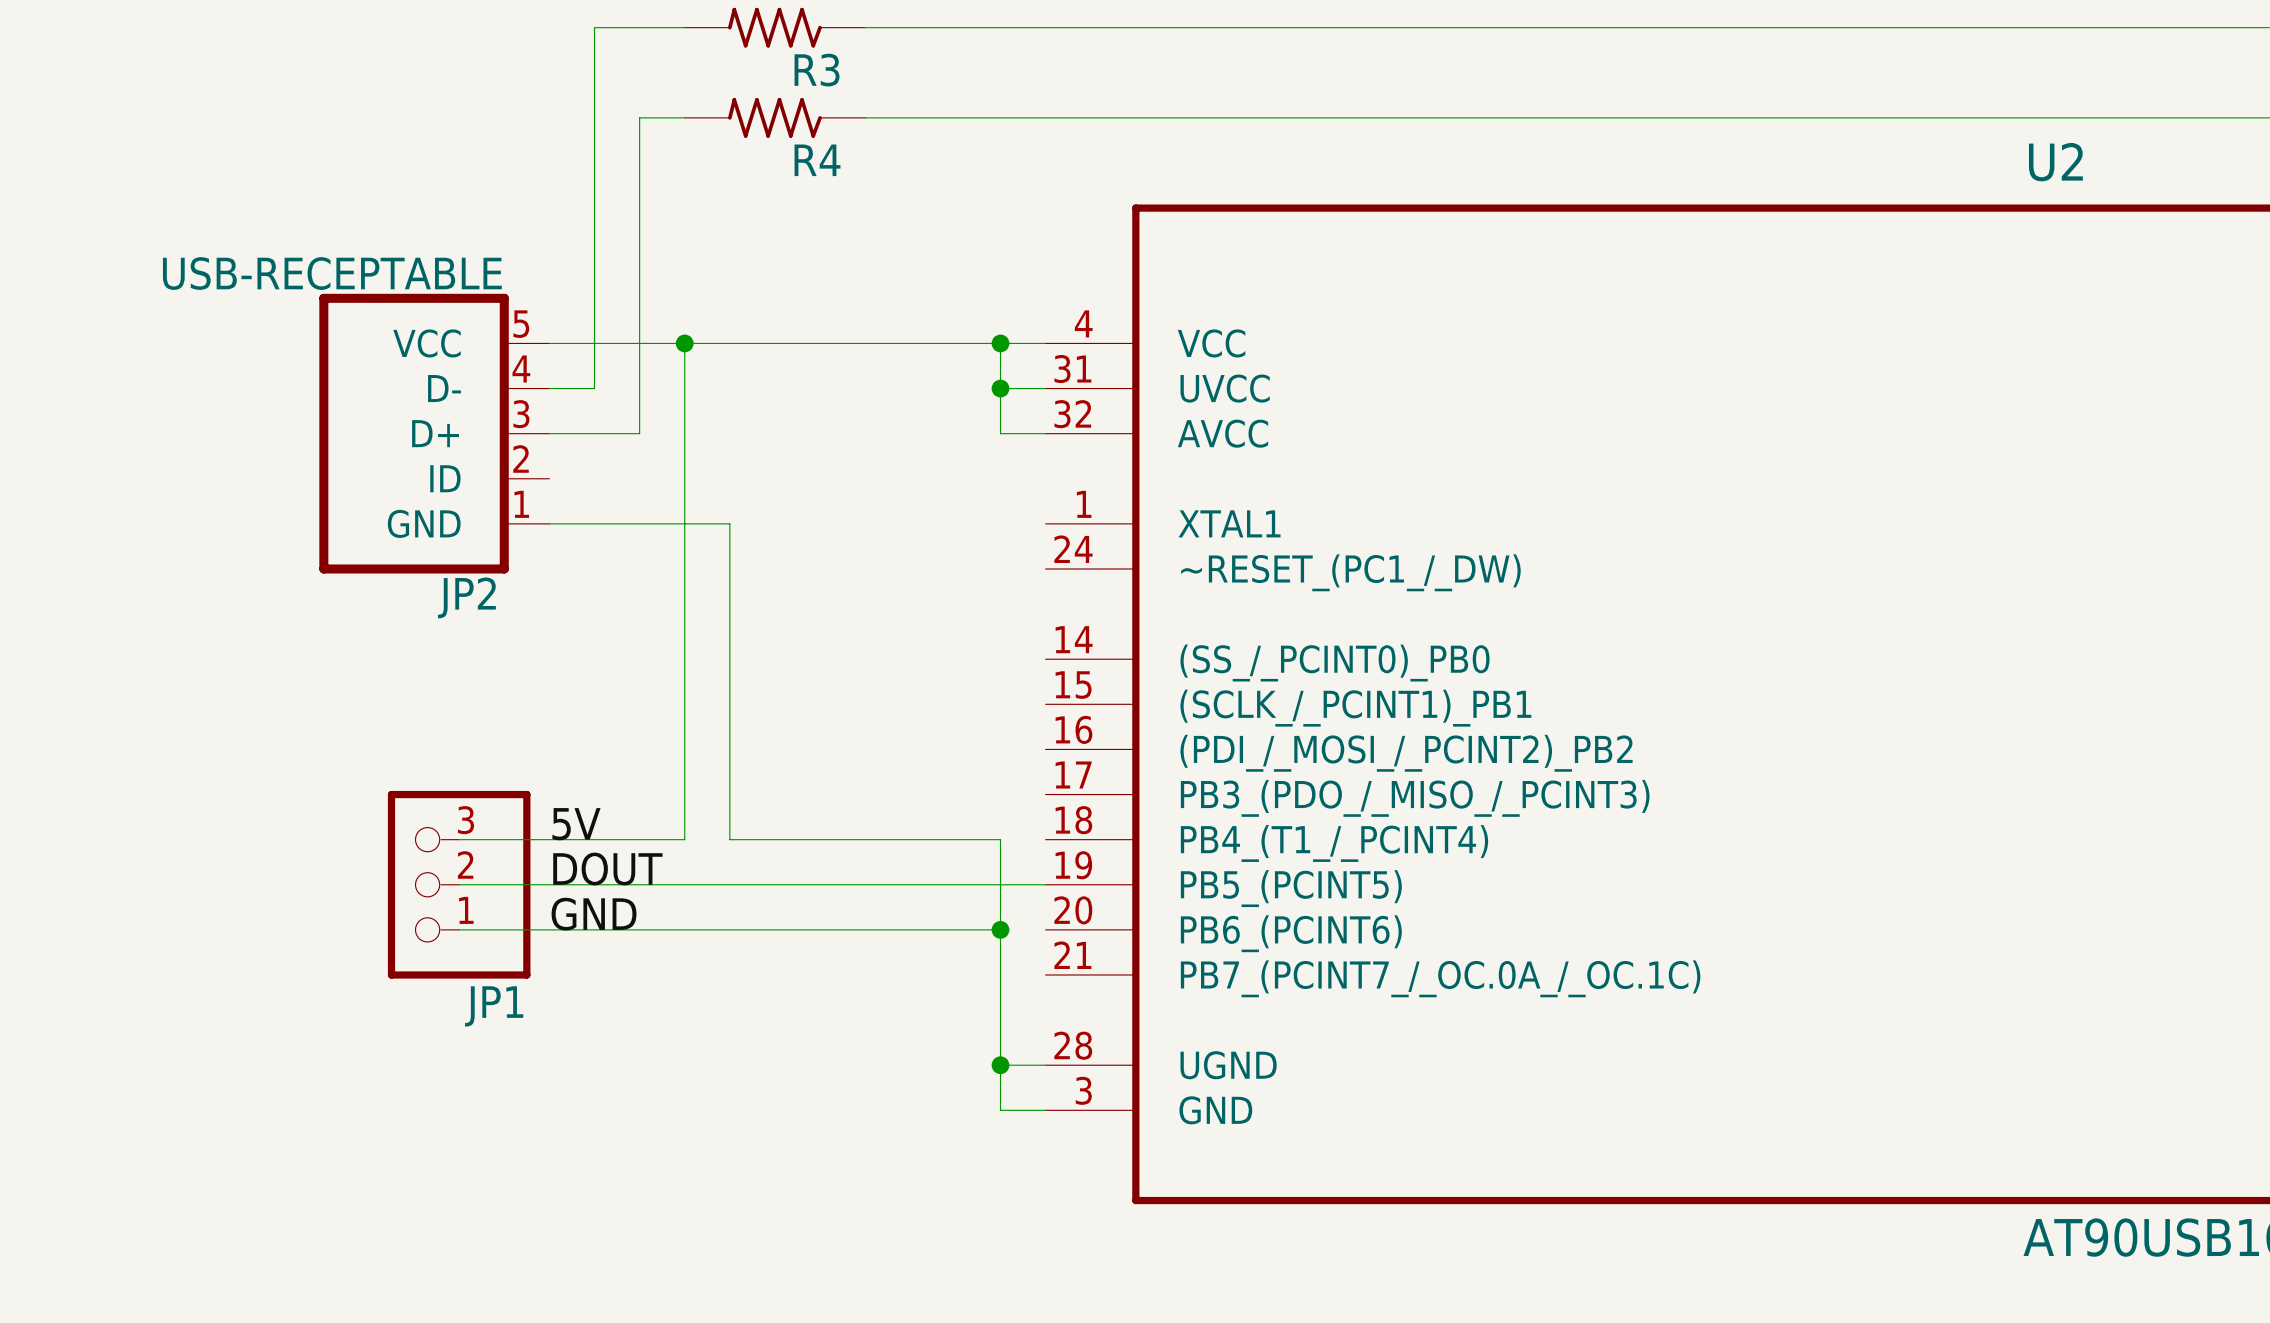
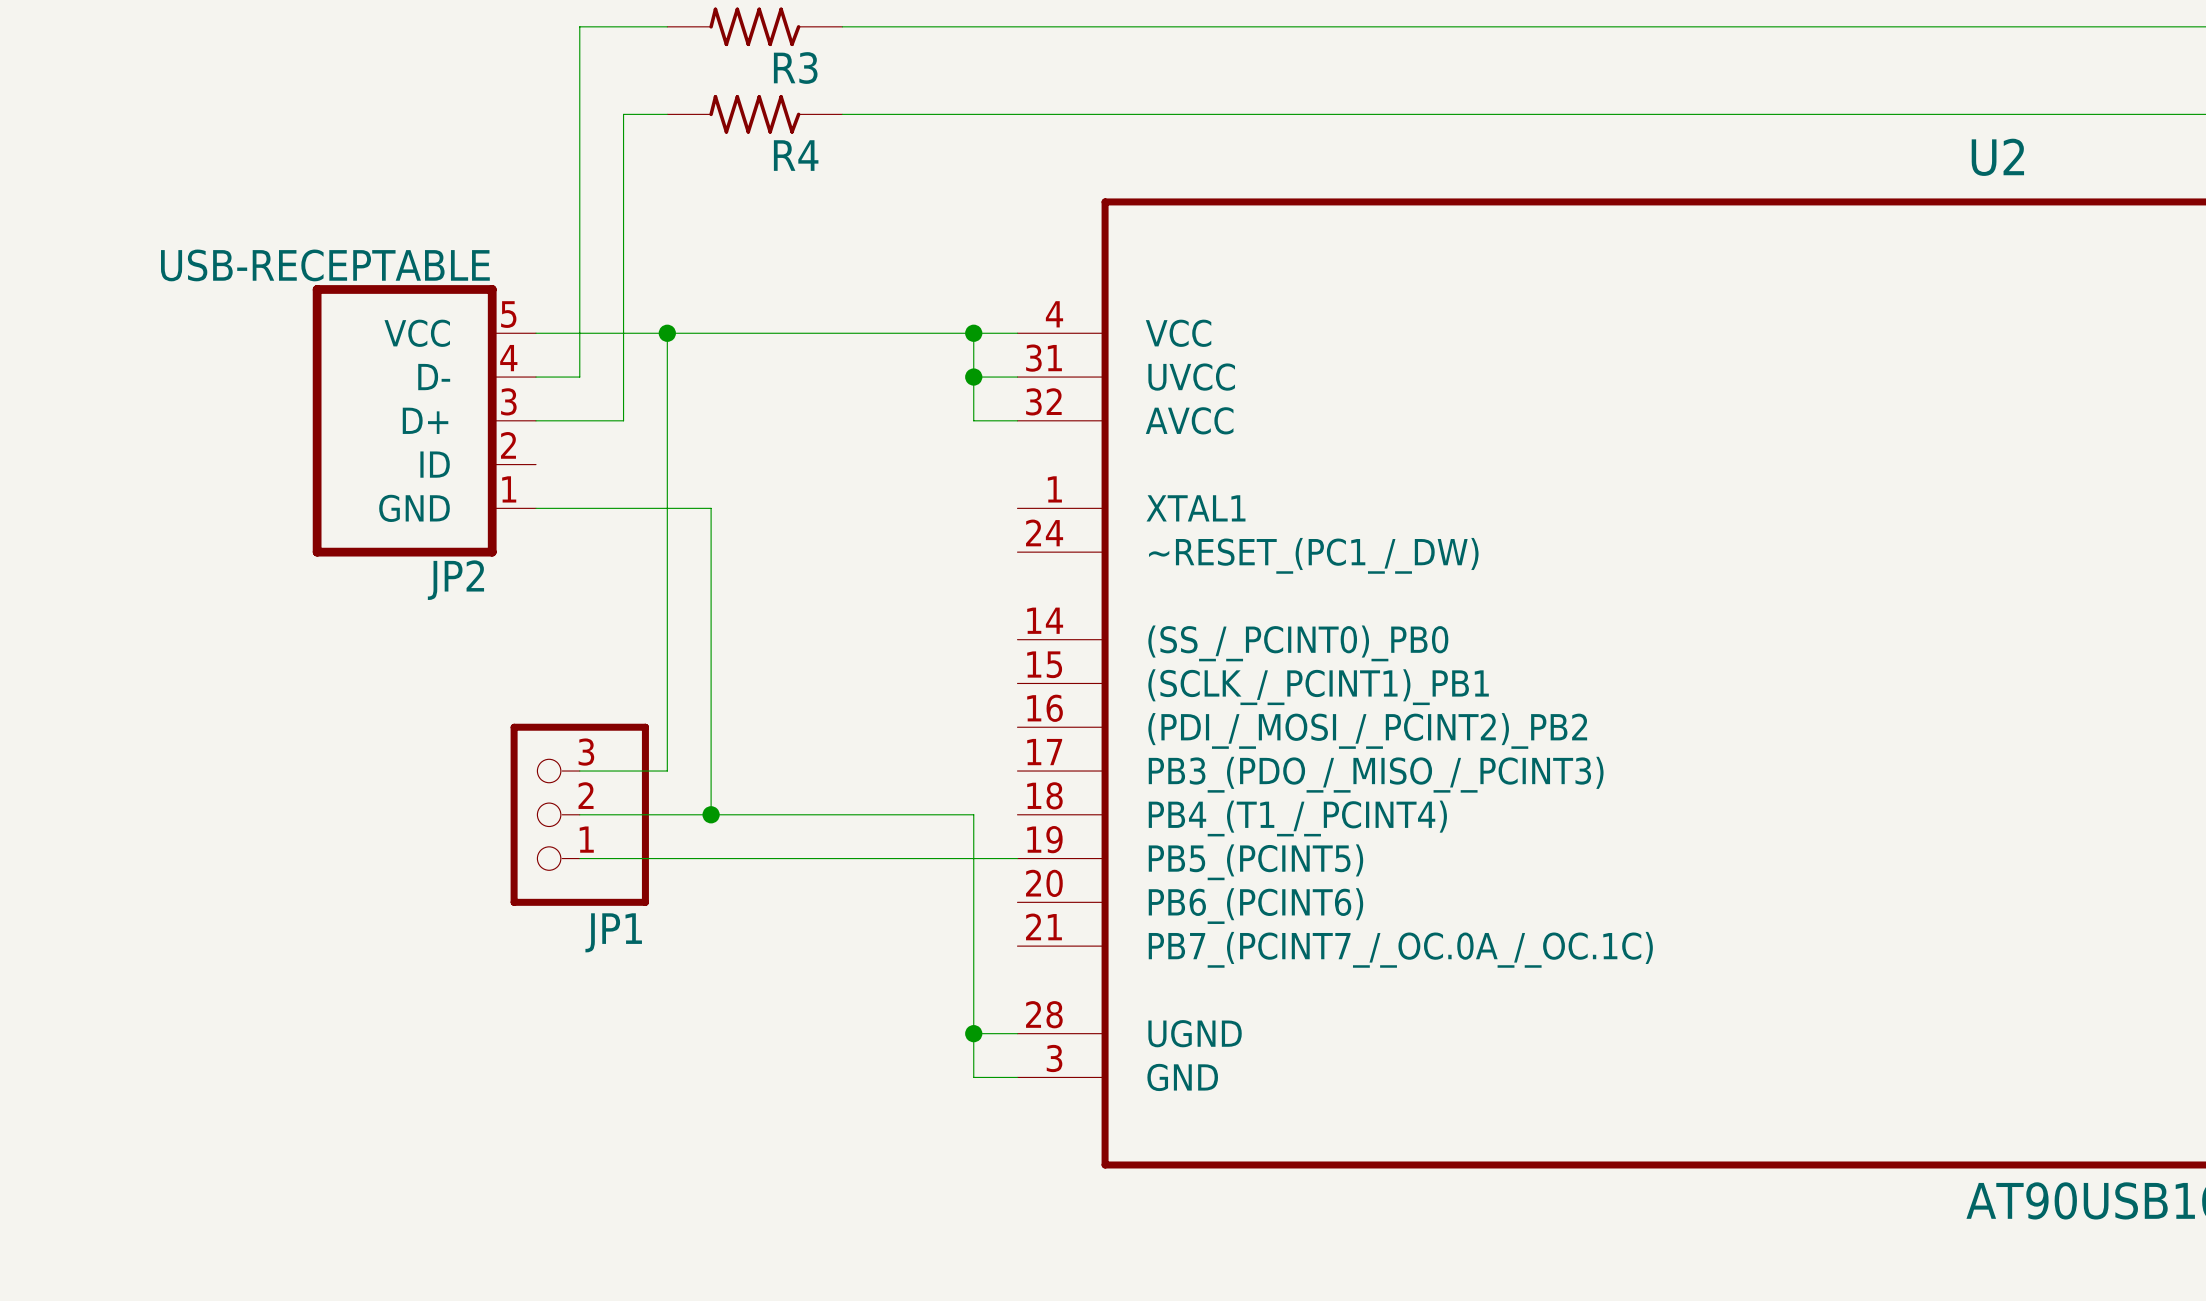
wire: none -> (579, 771) (667, 771)
wire: (684, 794) (684, 839) -> (711, 814) (667, 814)
label: 5V (576, 824) -> none
wire: (459, 839) (594, 839) -> none
junction: none -> (711, 814)
label: DOUT (607, 869) -> none
wire: (459, 884) (594, 884) -> none
JP1 position: (459, 884) -> (579, 814)
label: GND (594, 914) -> none
wire: (459, 929) (1000, 929) -> none
junction: (1000, 929) -> none

